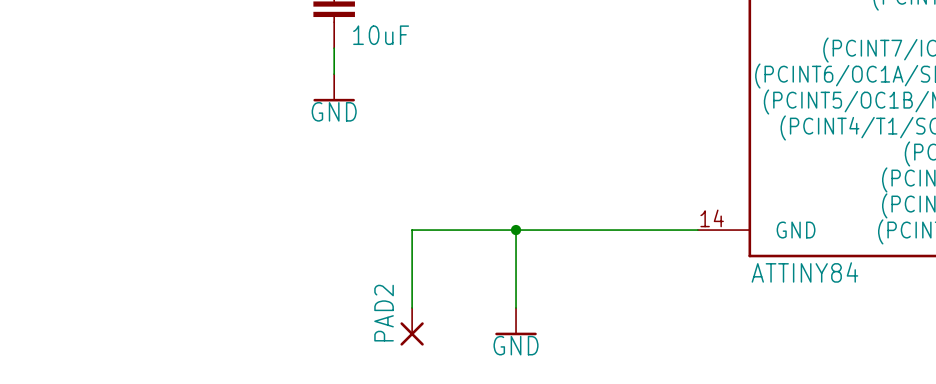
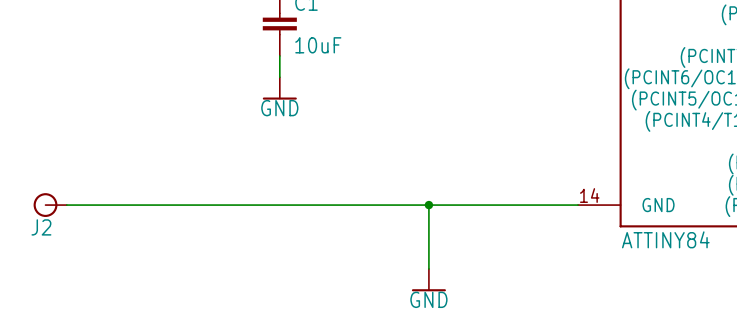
J2: none -> (50, 205)
wire: (412, 230) (412, 307) -> (343, 205) (66, 205)
PAD2: (412, 326) -> none

